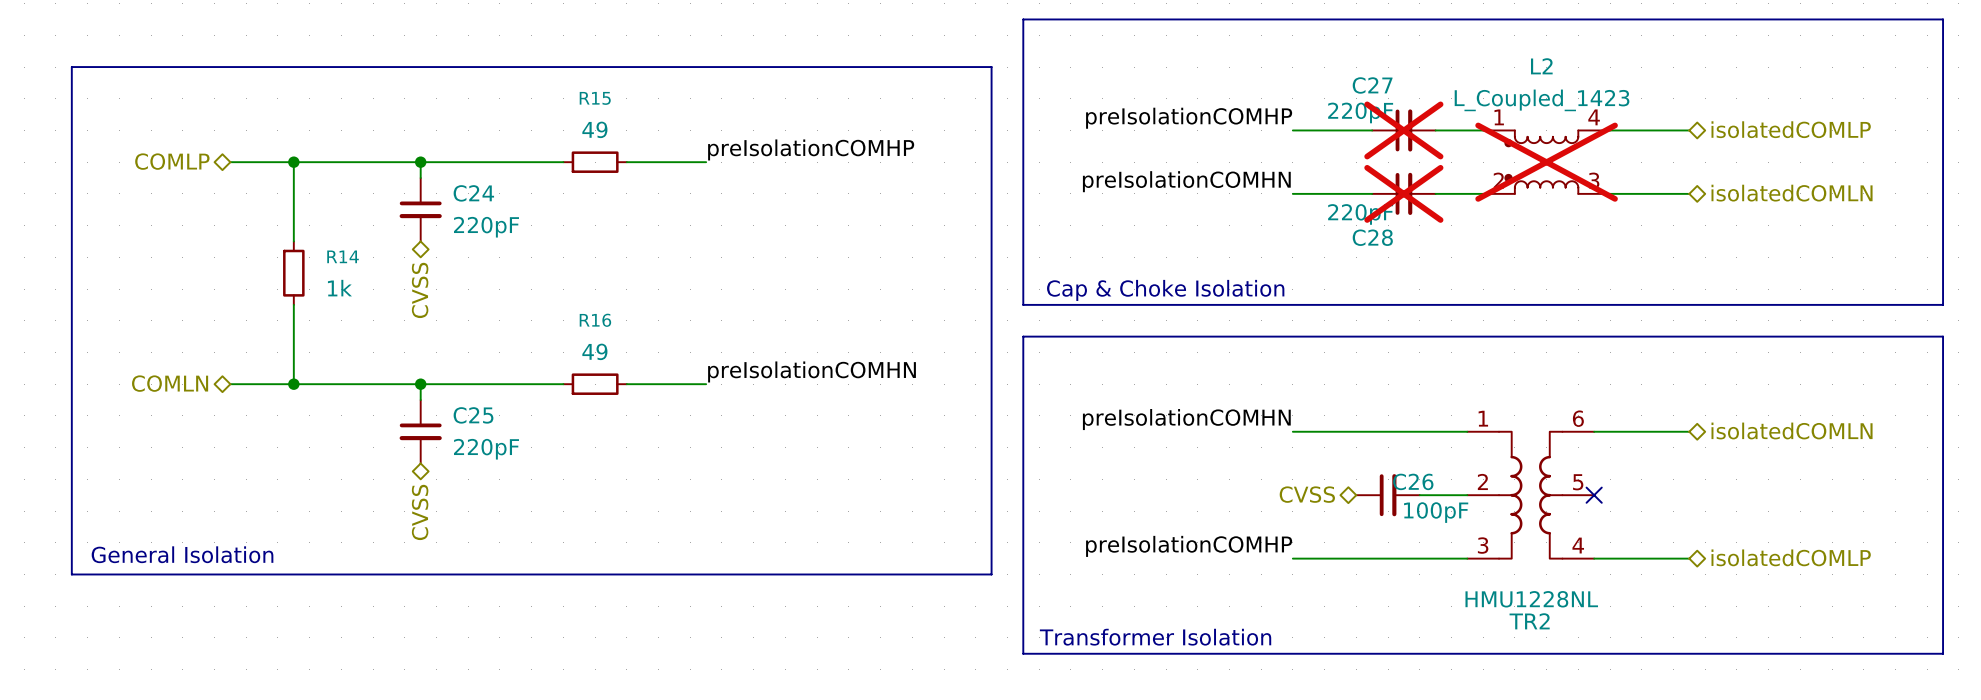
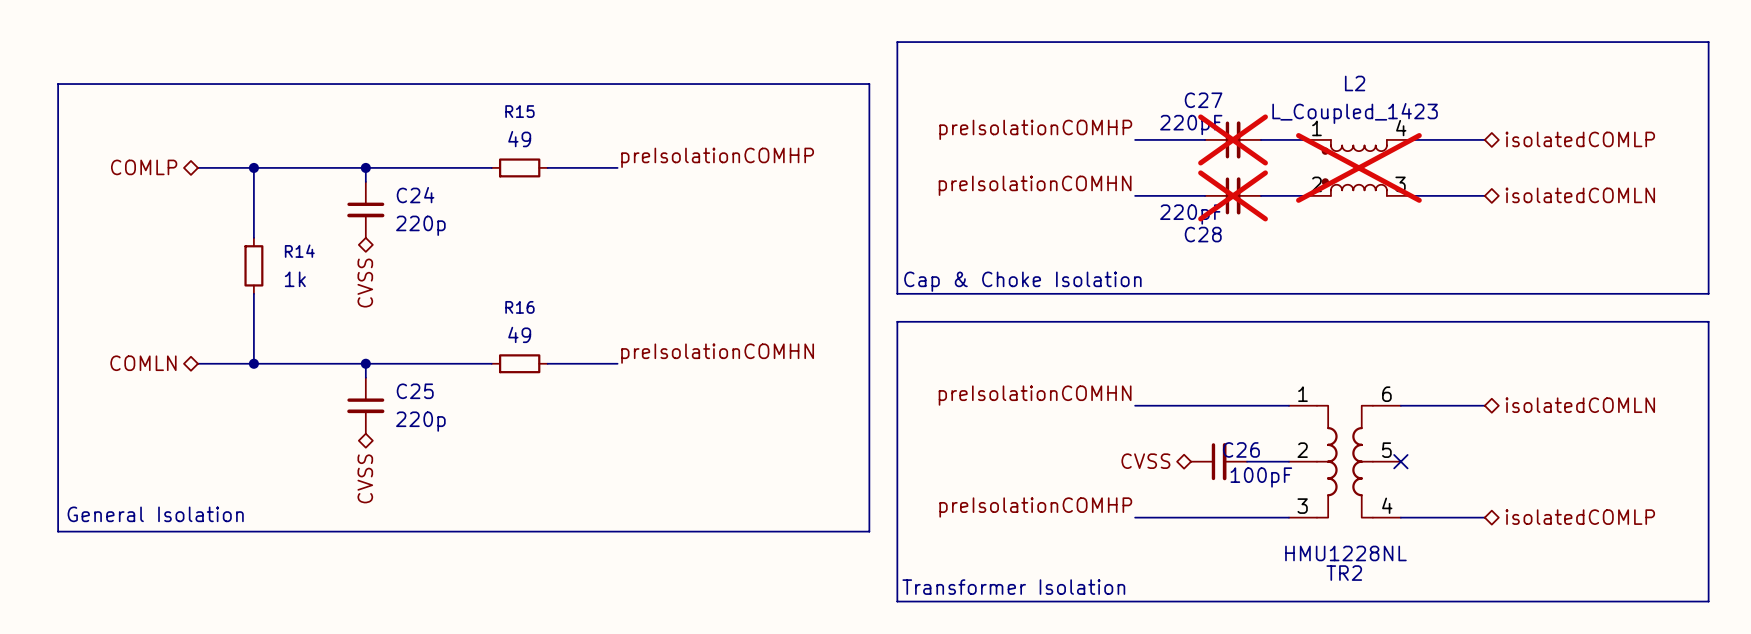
C24 value: 220pF (486, 227) -> 220p (420, 225)
C25 value: 220pF (486, 449) -> 220p (420, 421)

